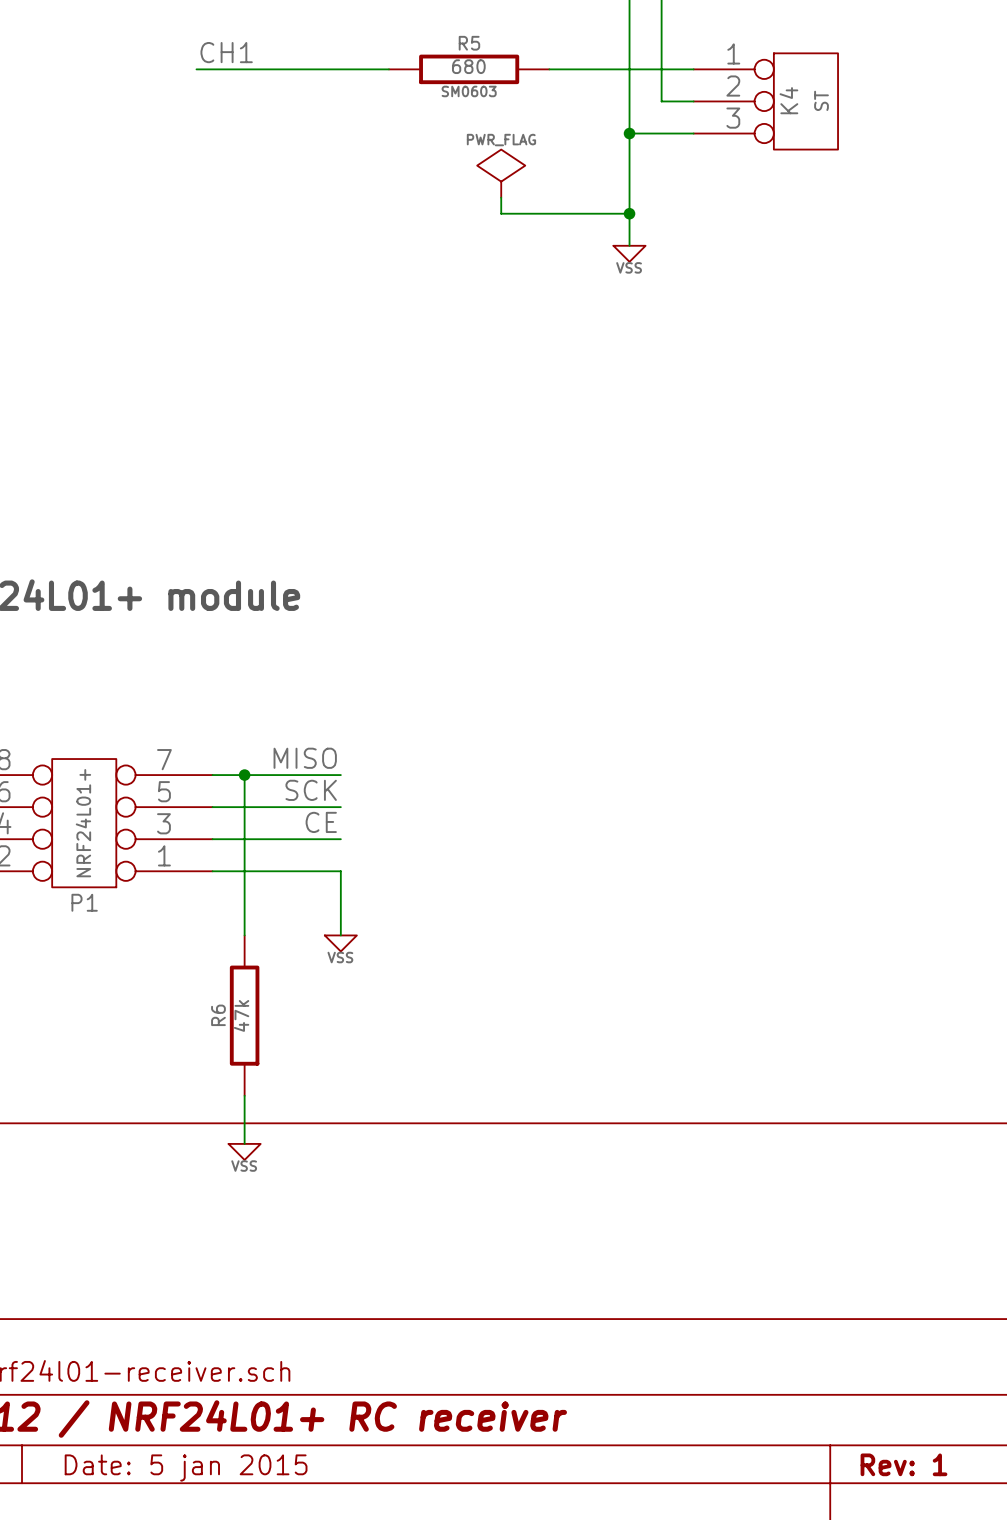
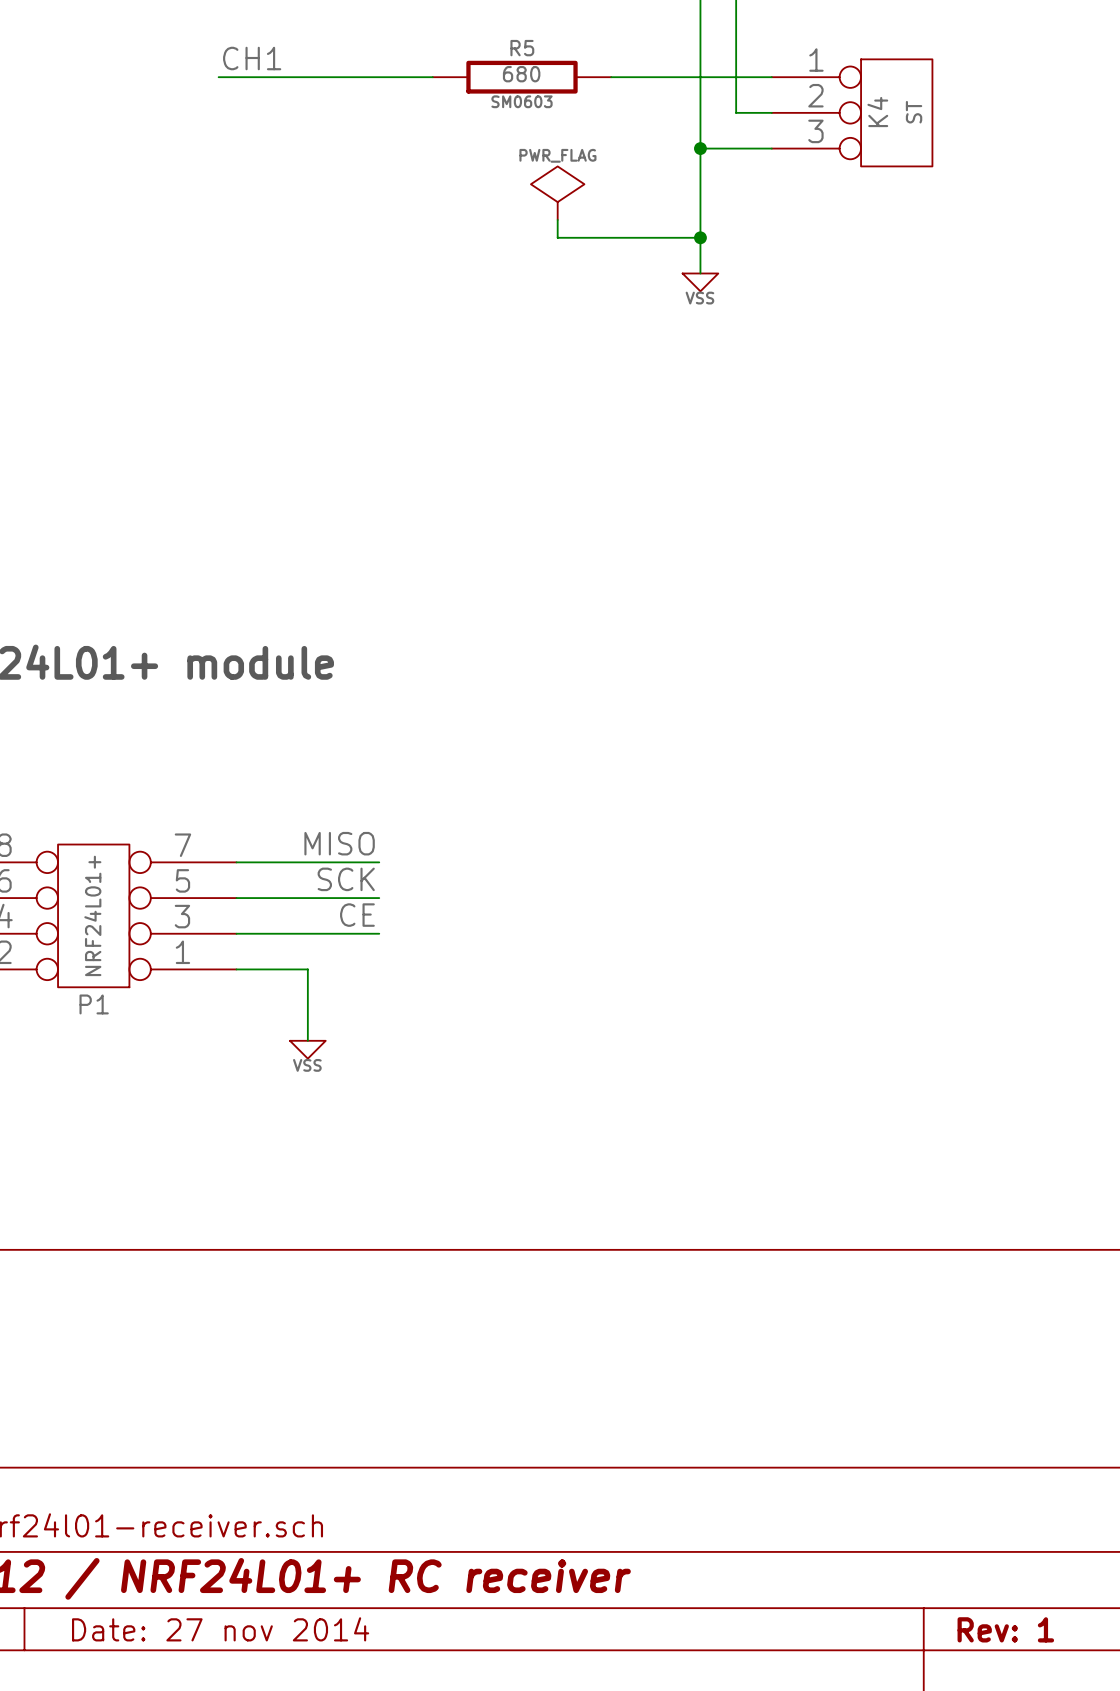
wire: (244, 775) (244, 935) -> none
junction: (244, 775) -> none
wire: (276, 871) (340, 871) (340, 935) -> (307, 969) (307, 1040)
power symbol position: VSS (340, 943) -> VSS (307, 1049)
R6: 47k (244, 1015) -> none
wire: (244, 1095) (244, 1143) -> none
power symbol: VSS (244, 1151) -> none
title block: Date: 5 jan 2015 (186, 1467) -> Date: 27 nov 2014 (220, 1629)

